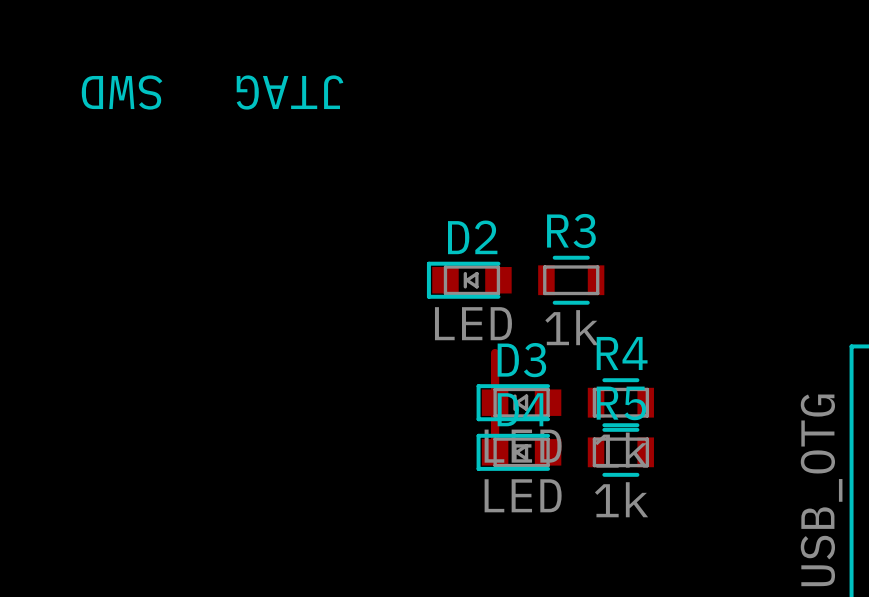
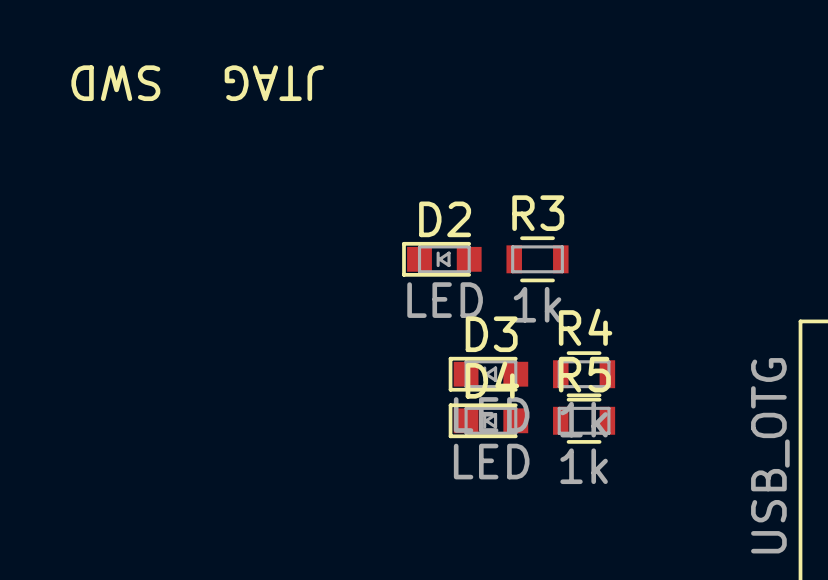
track: (495, 353) (495, 452) -> none

